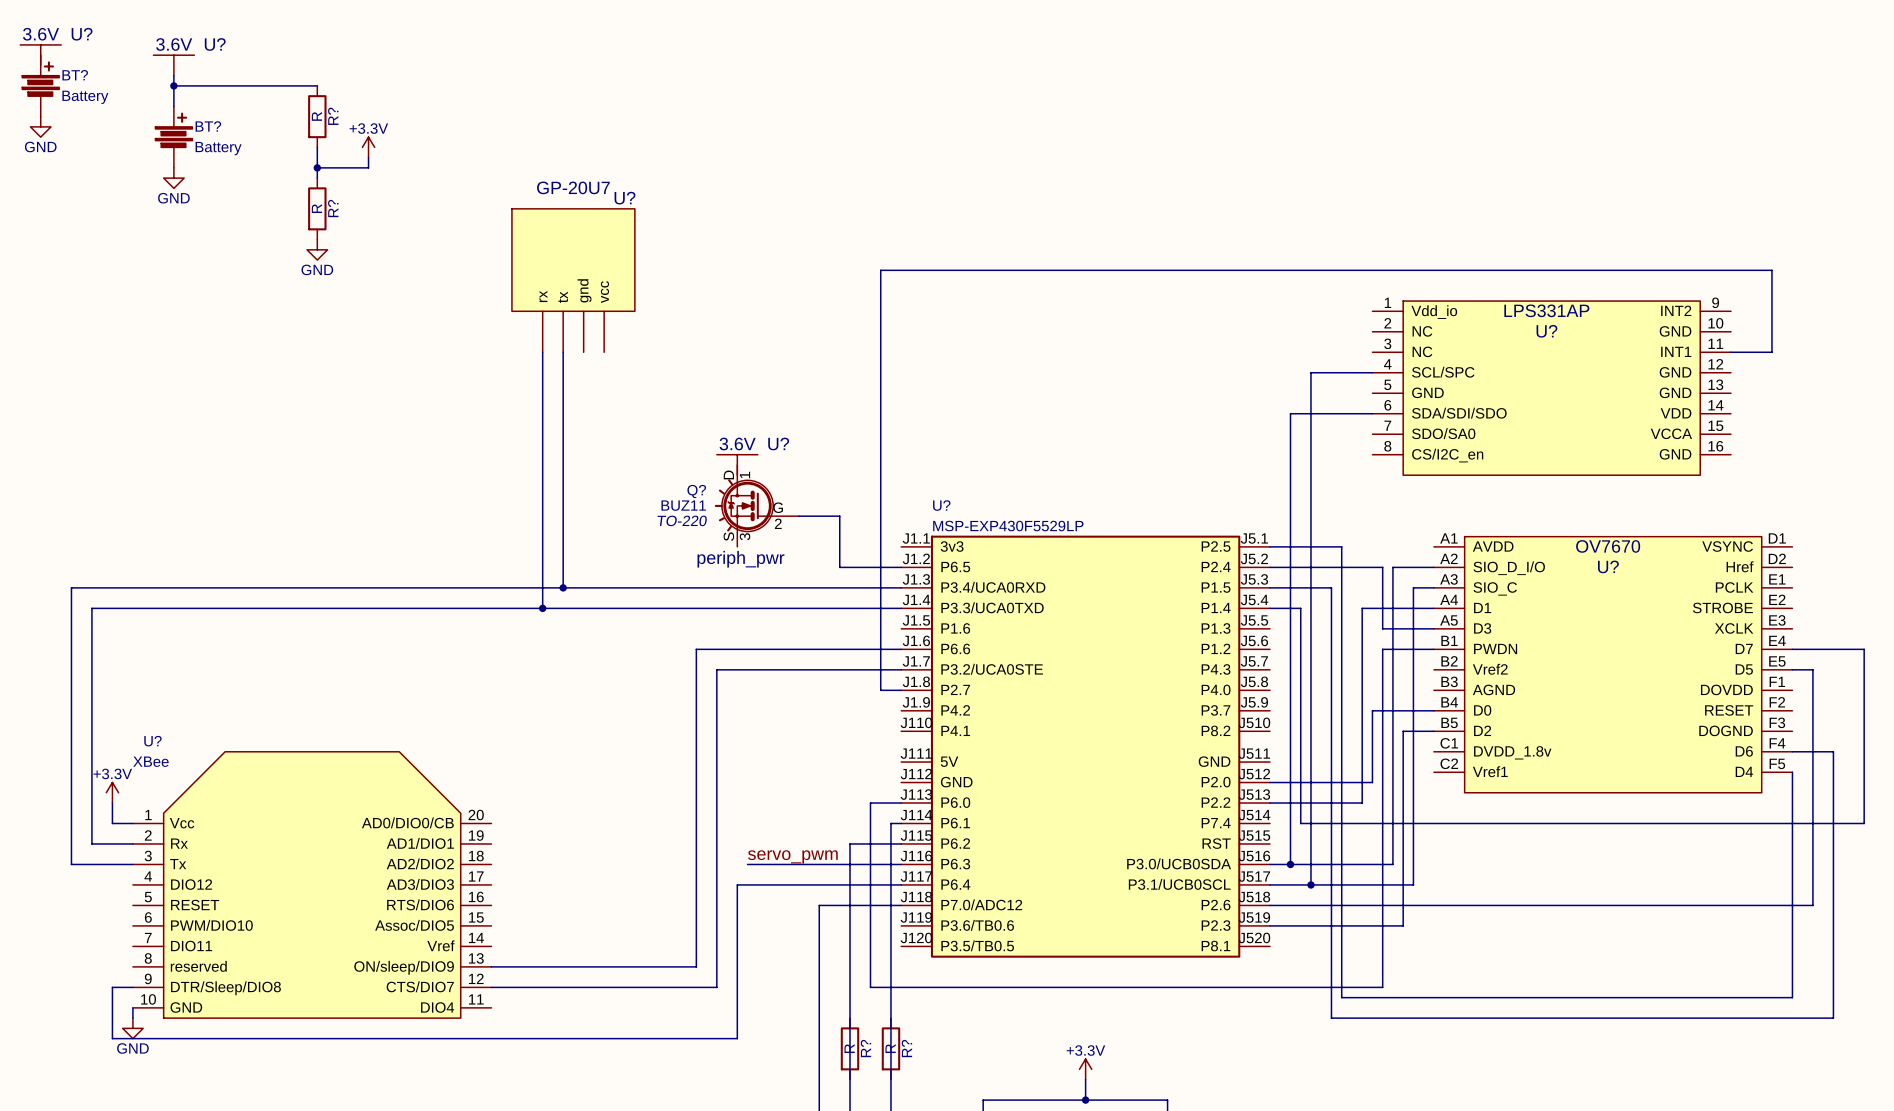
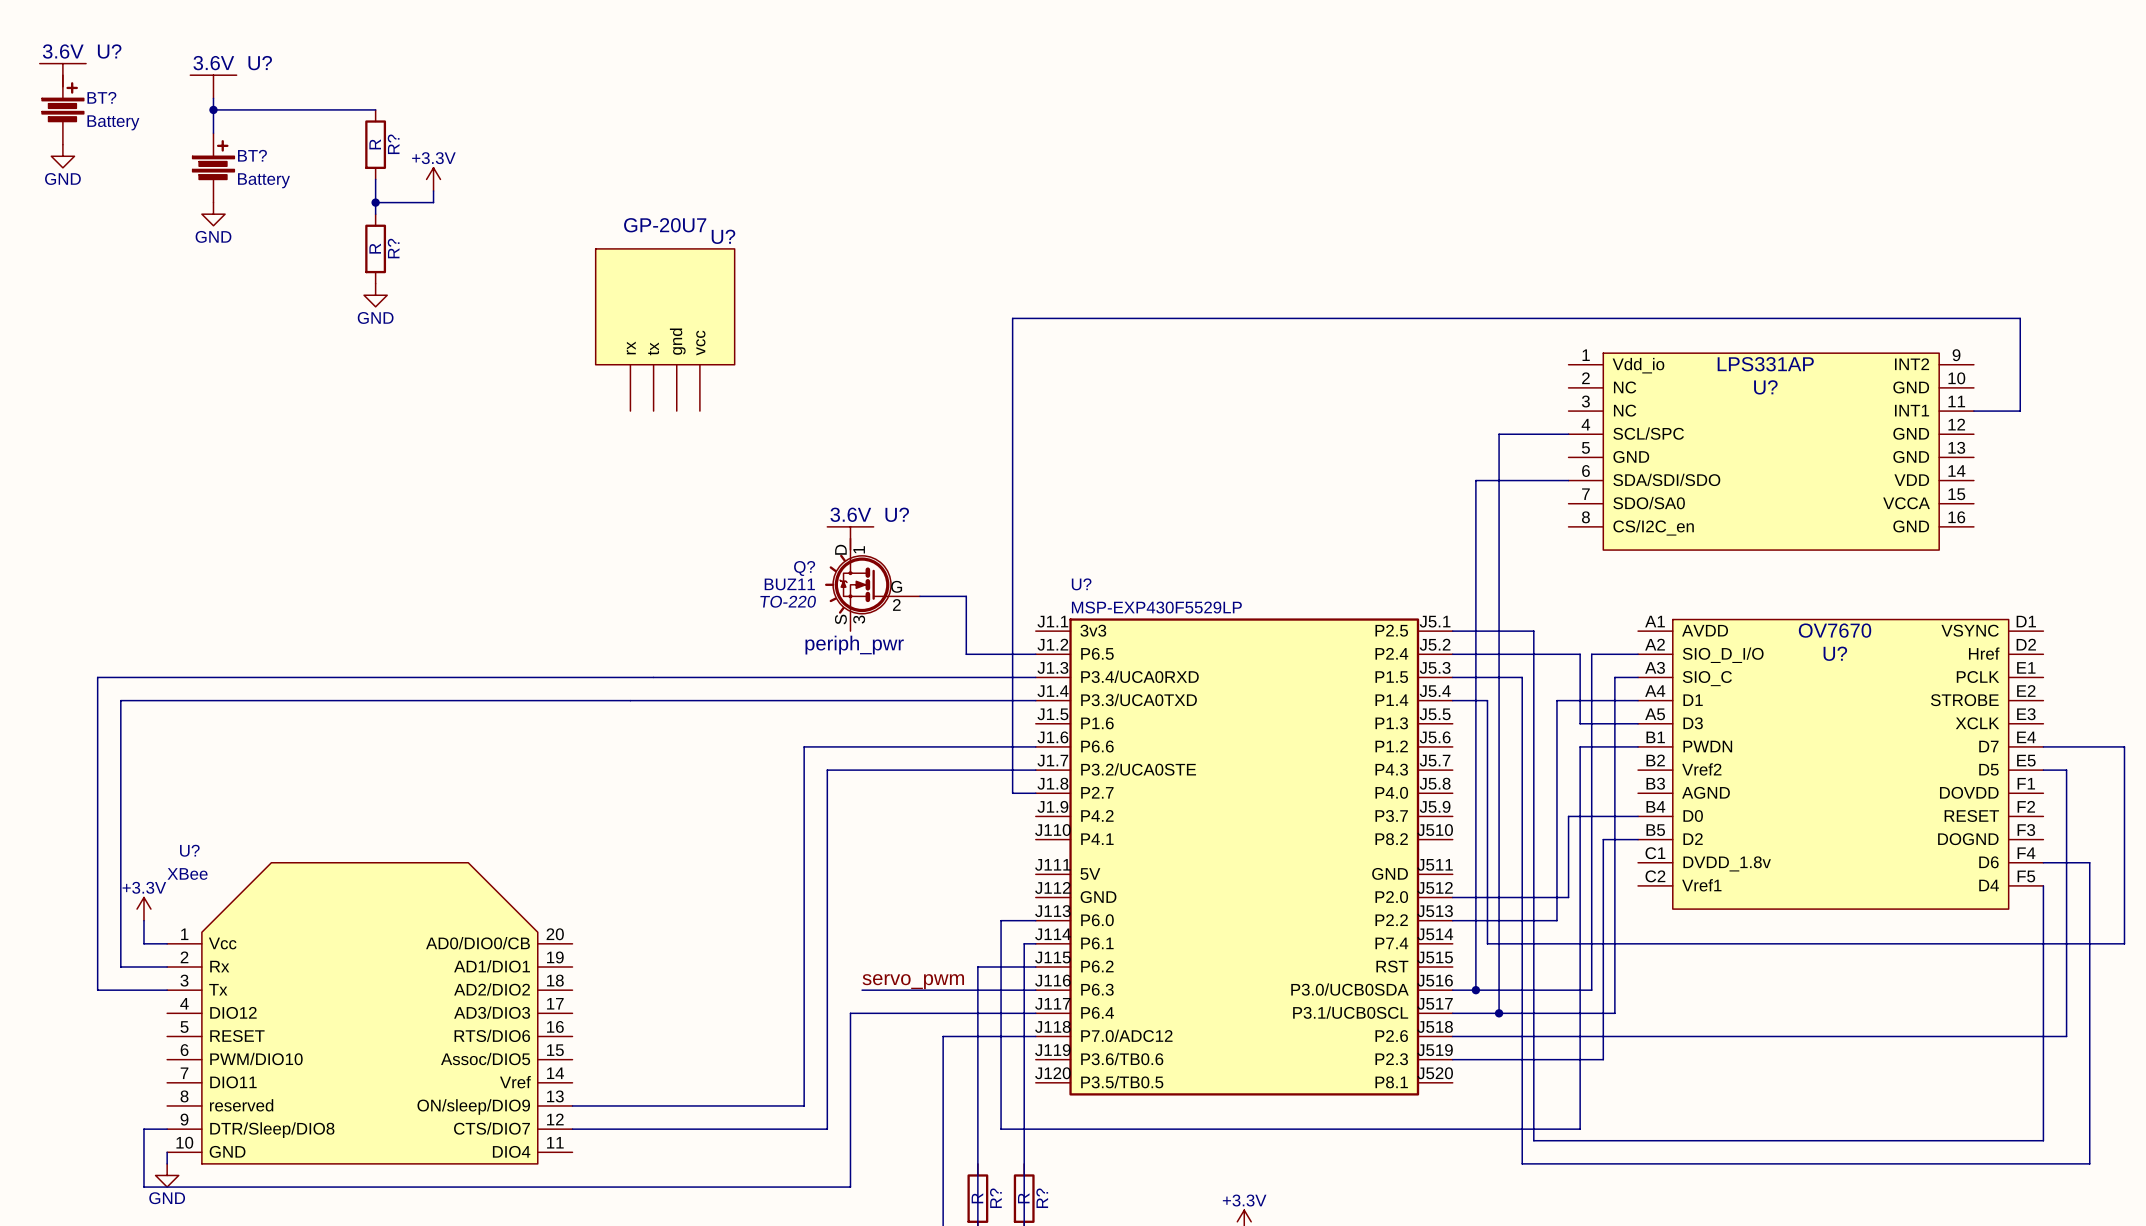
wire: (542, 352) (542, 608) -> none
wire: (563, 352) (563, 587) -> none
junction: (563, 587) -> none
junction: (542, 608) -> none

